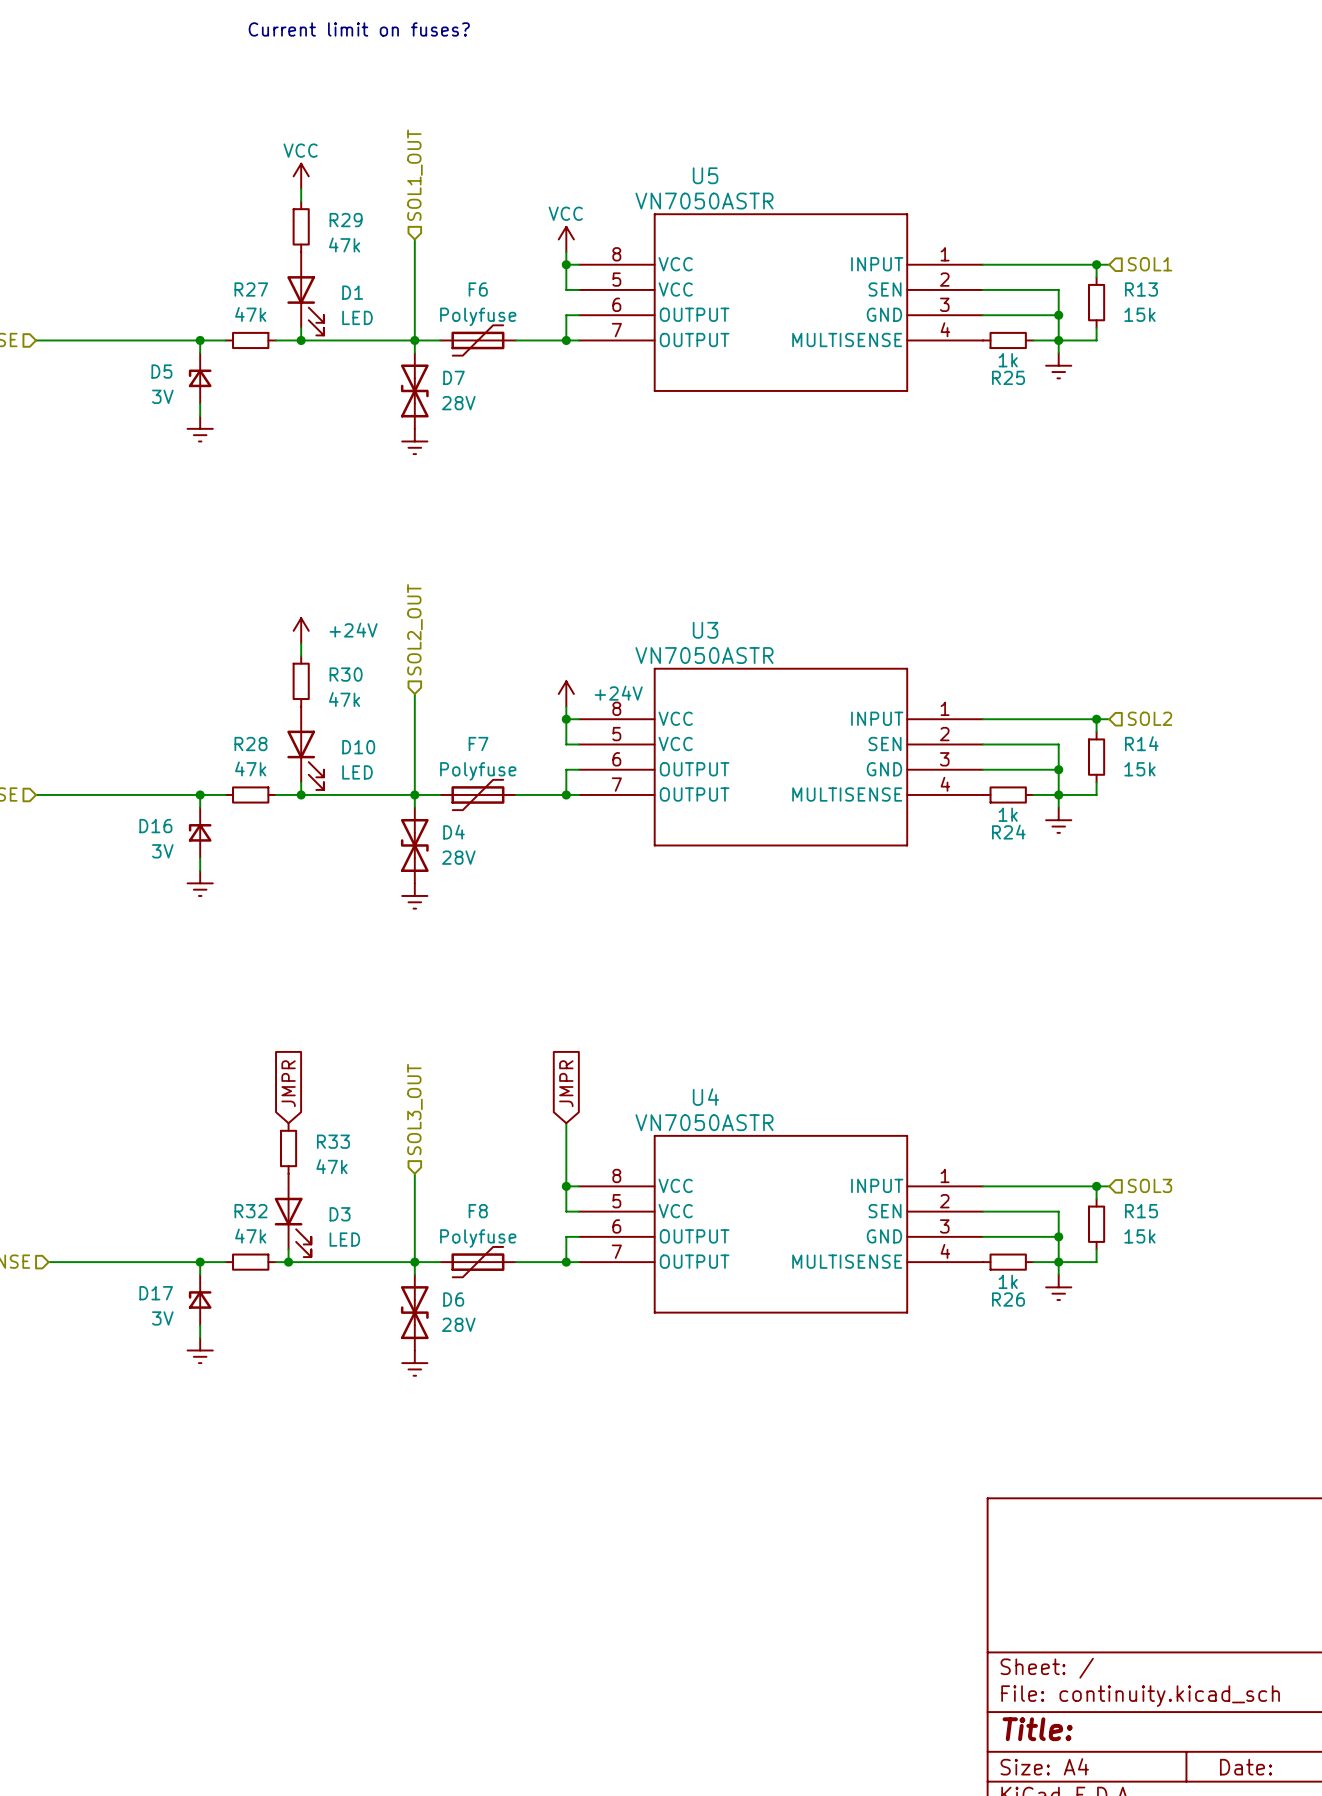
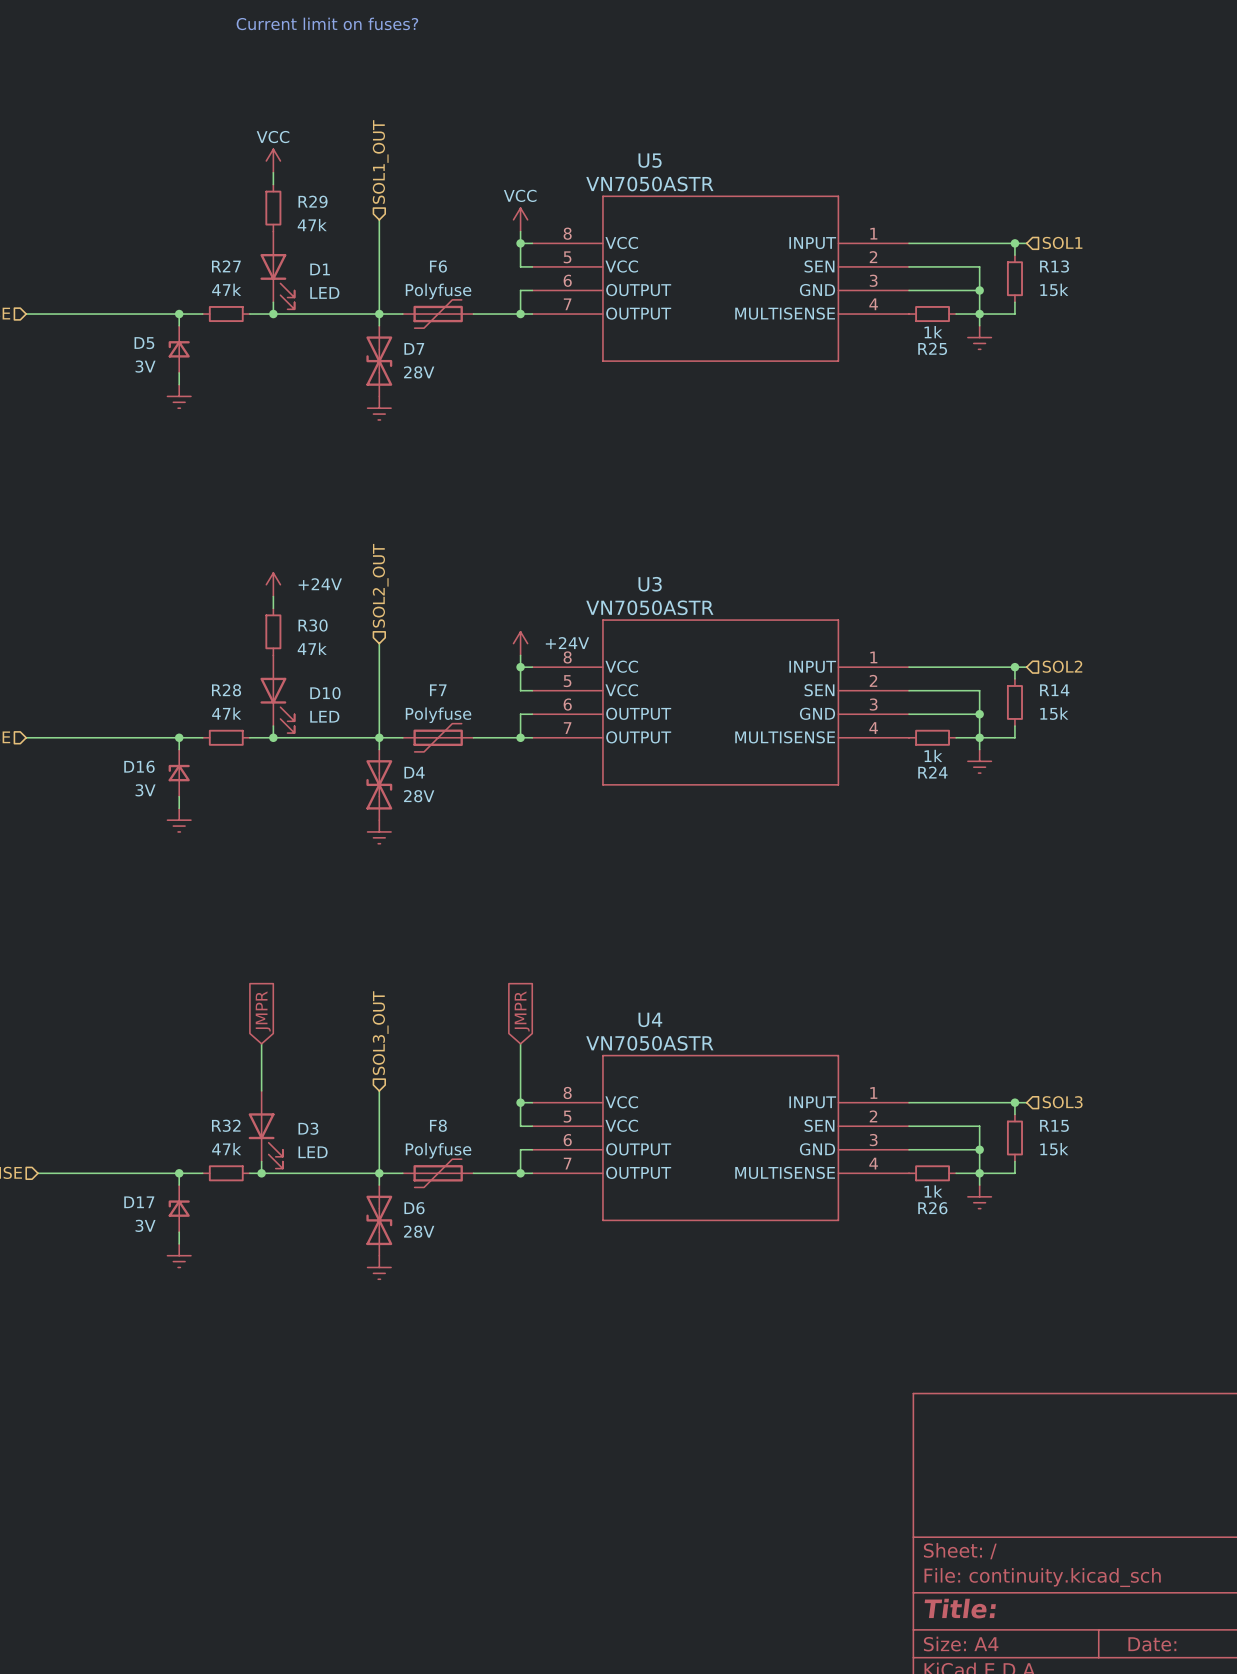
wire: none -> (261, 1043) (261, 1090)
R33: 47k (288, 1148) -> none

